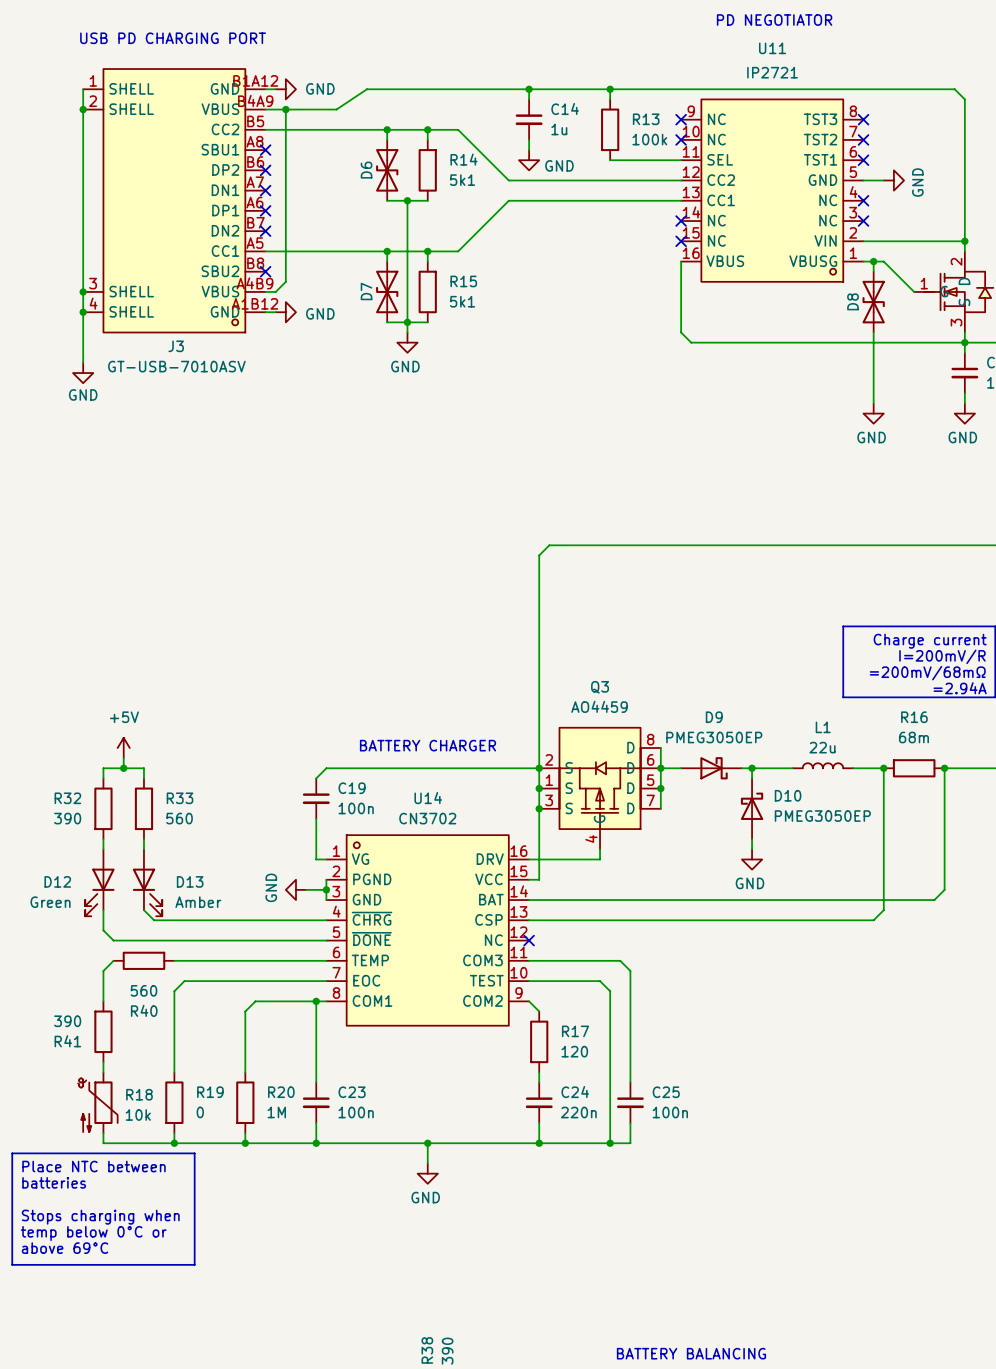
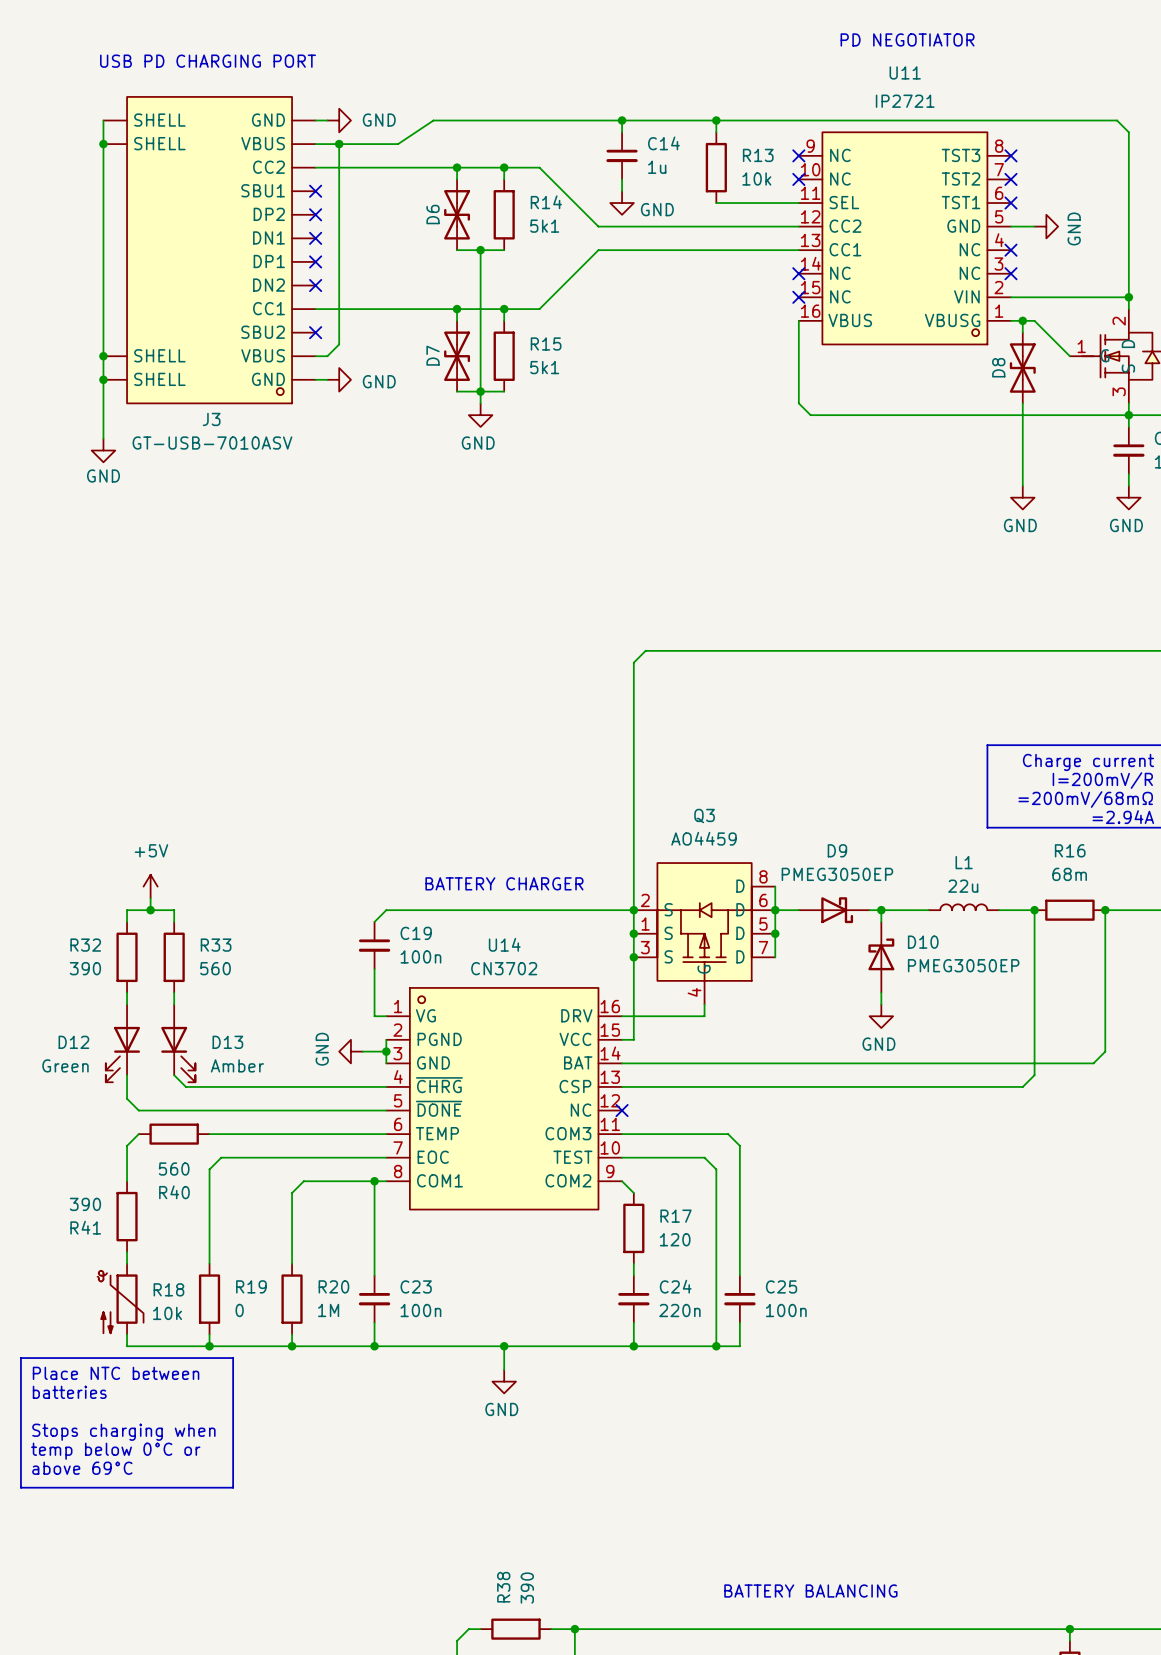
J3 symbol: [83, 69, 266, 333] -> [103, 96, 316, 404]
R13 value: 100k (649, 139) -> 10k (756, 179)

